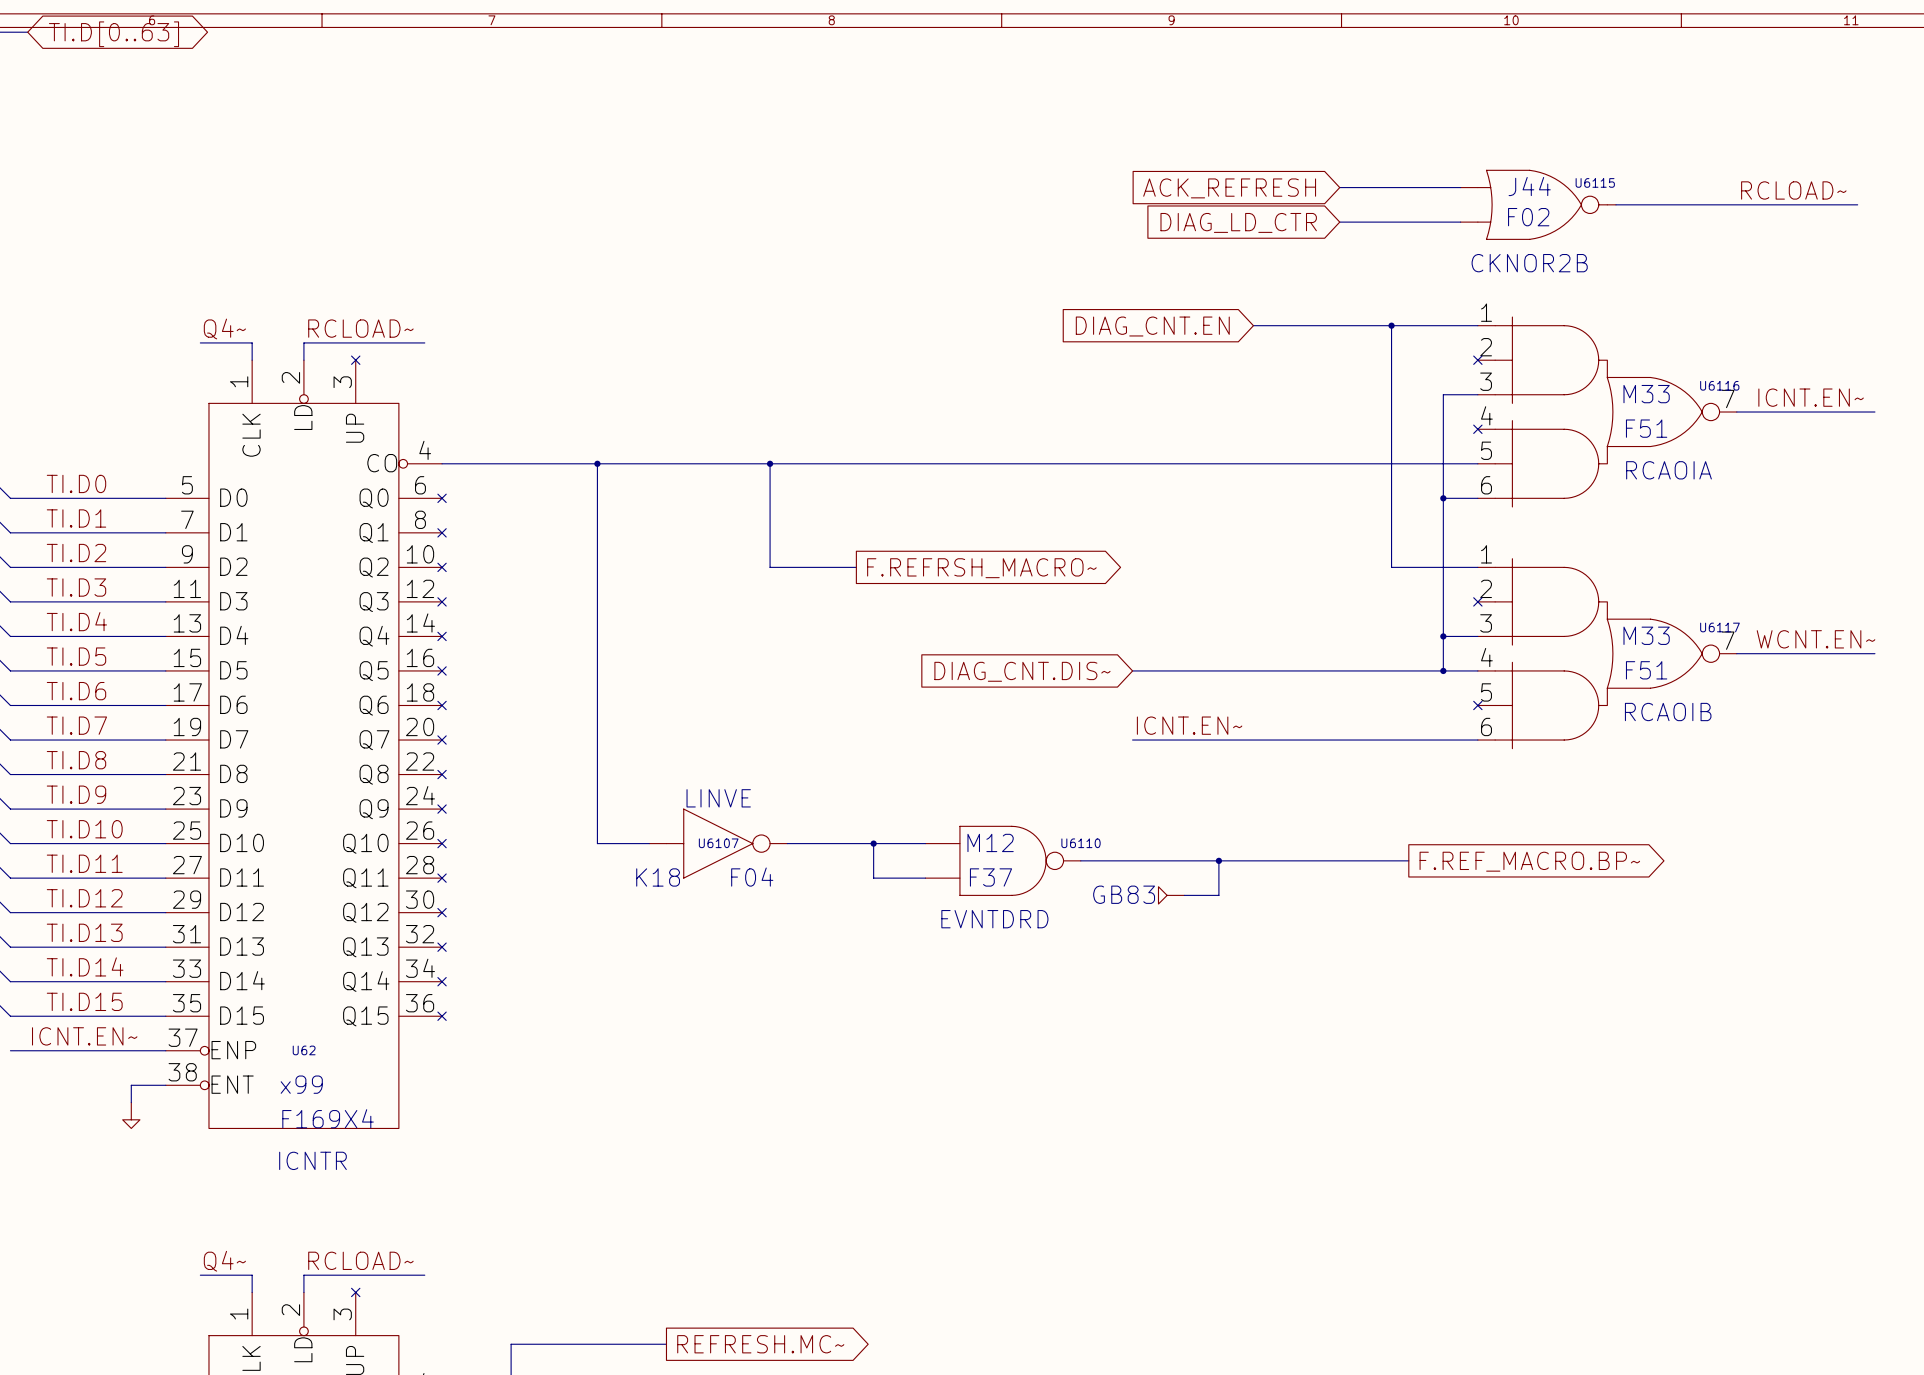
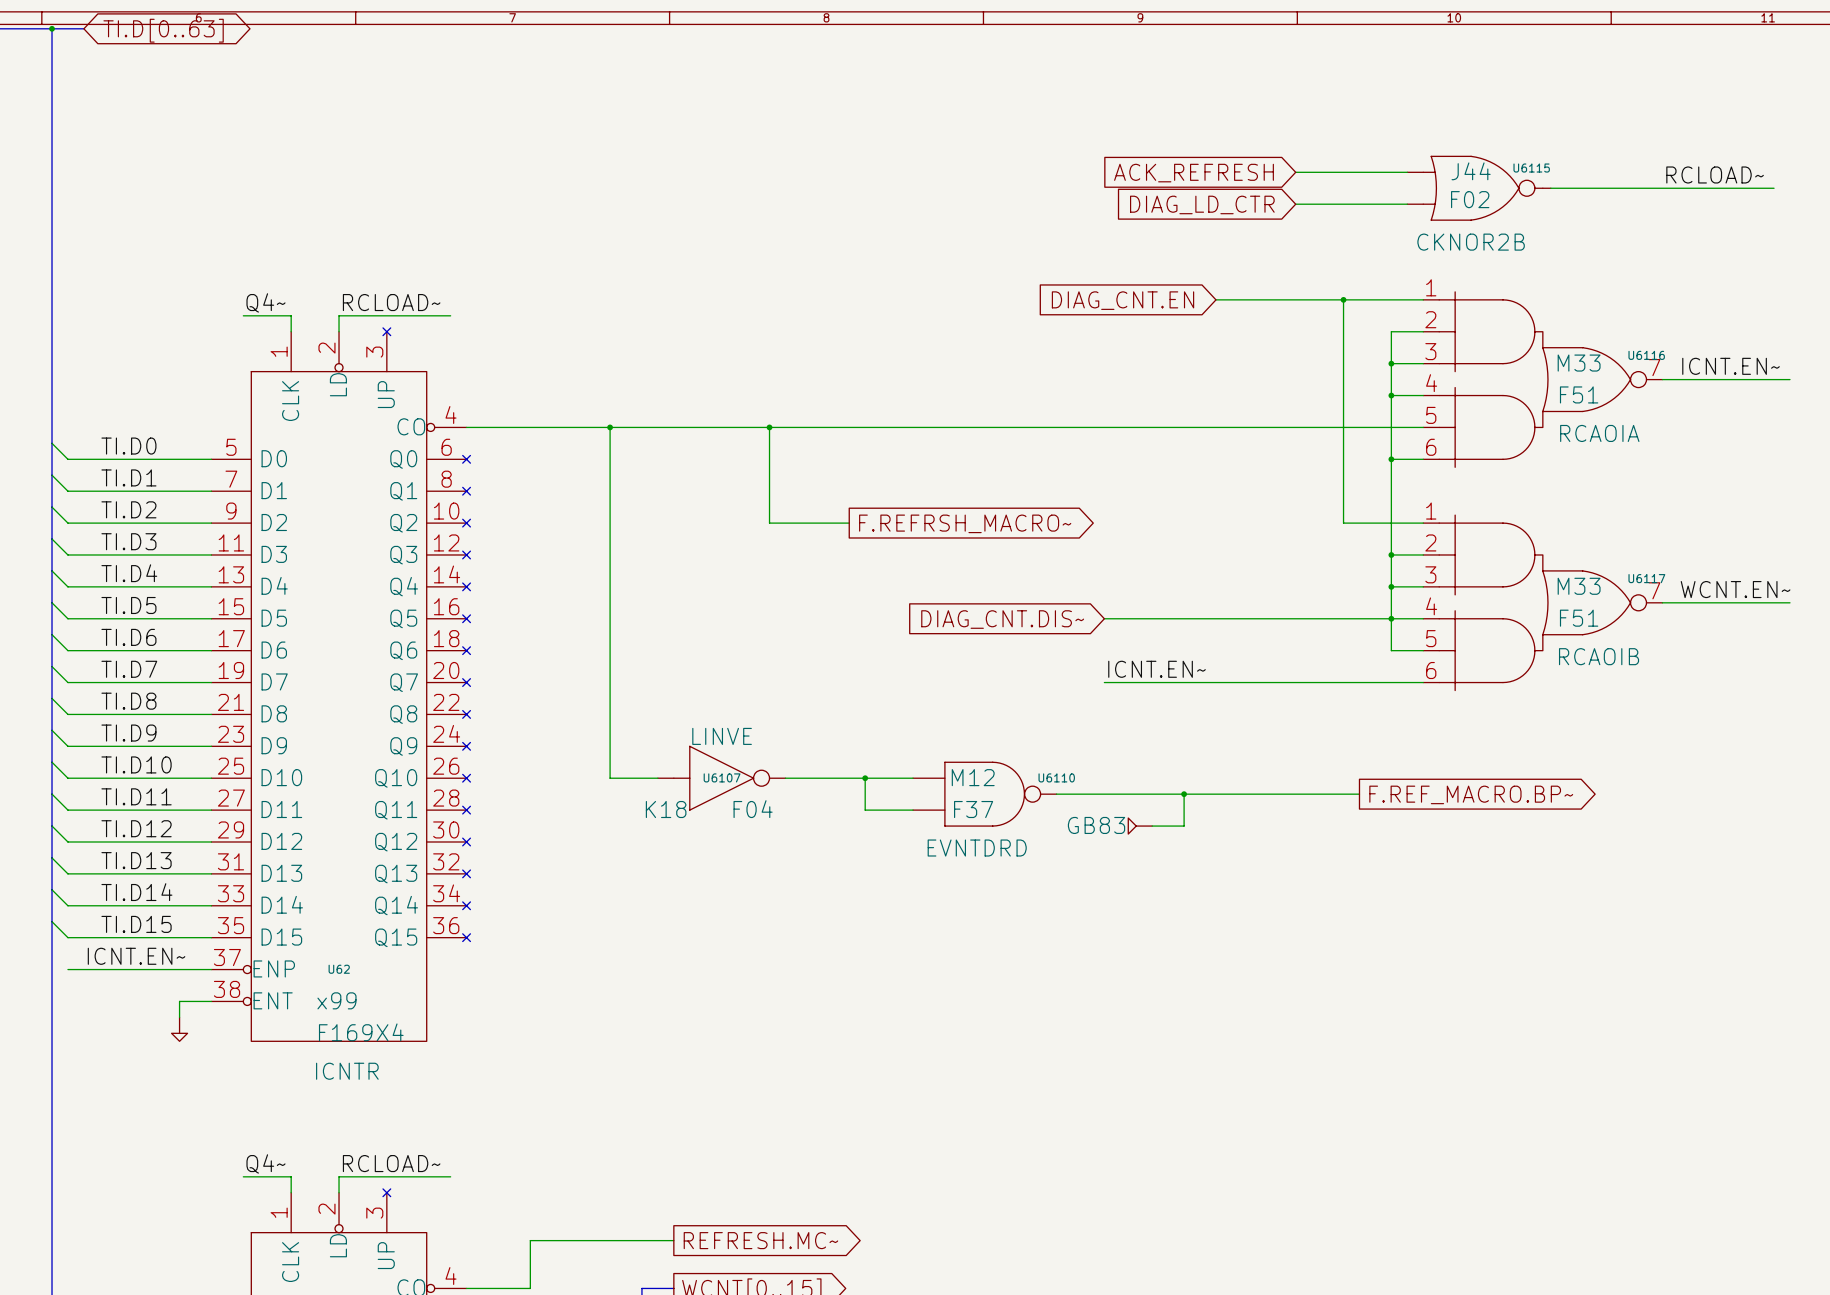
wire: none -> (1423, 331) (1391, 331) (1391, 363)
no-connect mark: (1477, 360) -> none
junction: none -> (1391, 363)
wire: none -> (1391, 395) (1423, 395)
junction: none -> (1391, 395)
no-connect mark: (1477, 429) -> none
wire: none -> (1391, 554) (1423, 554)
junction: none -> (1391, 554)
no-connect mark: (1477, 601) -> none
wire: none -> (1391, 618) (1391, 650) (1423, 650)
no-connect mark: (1477, 705) -> none

